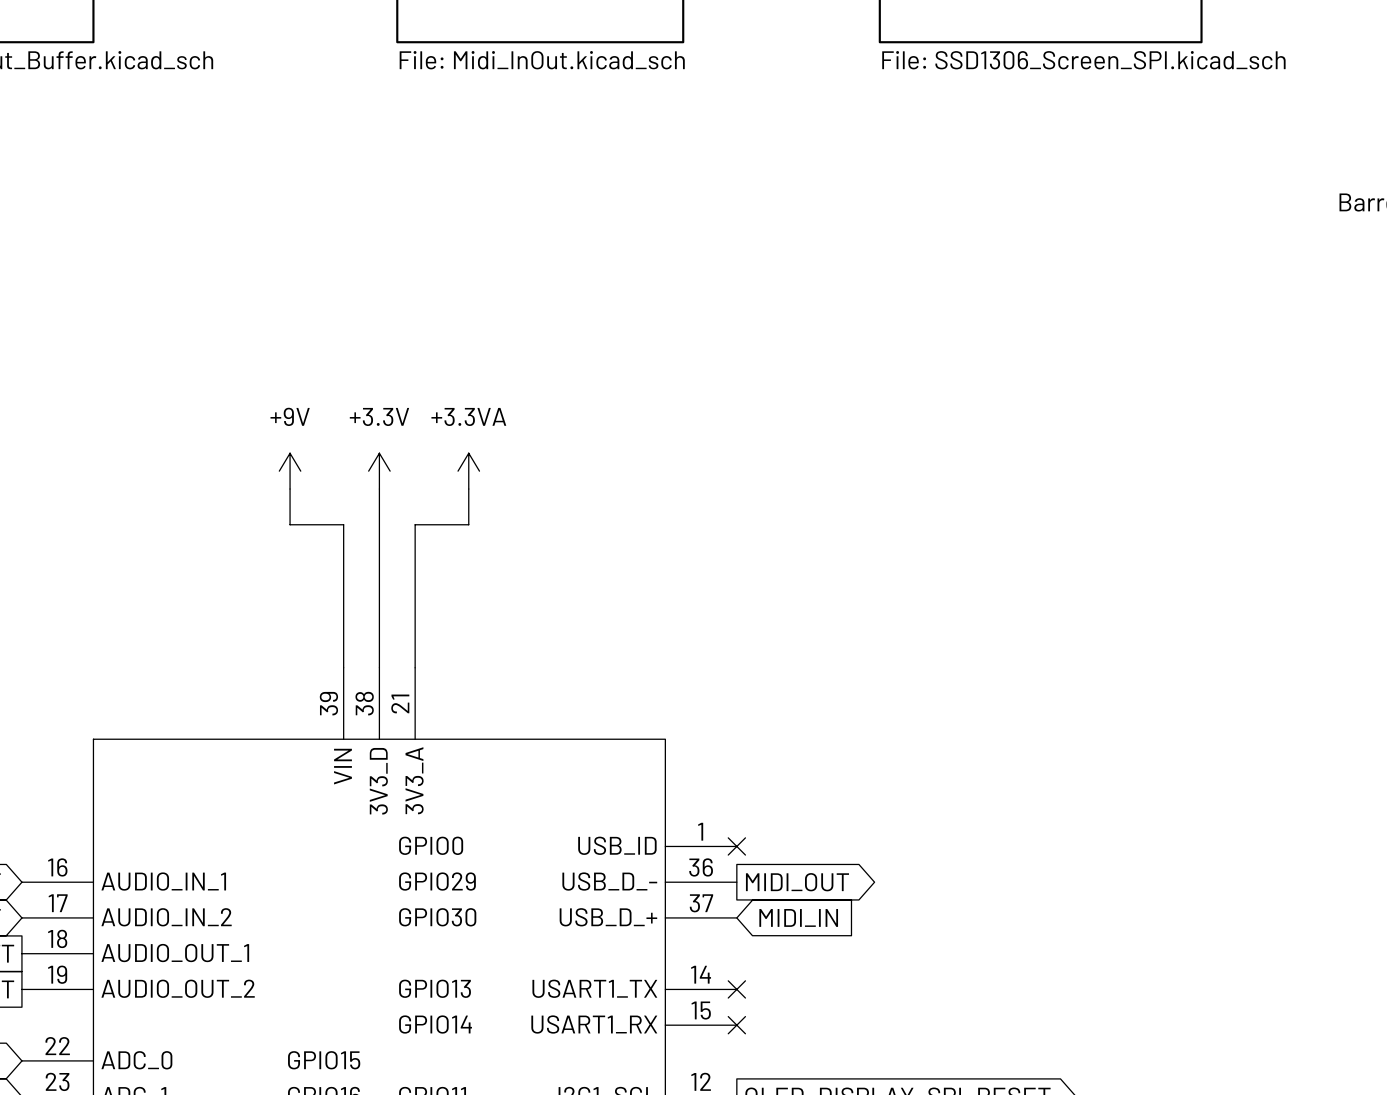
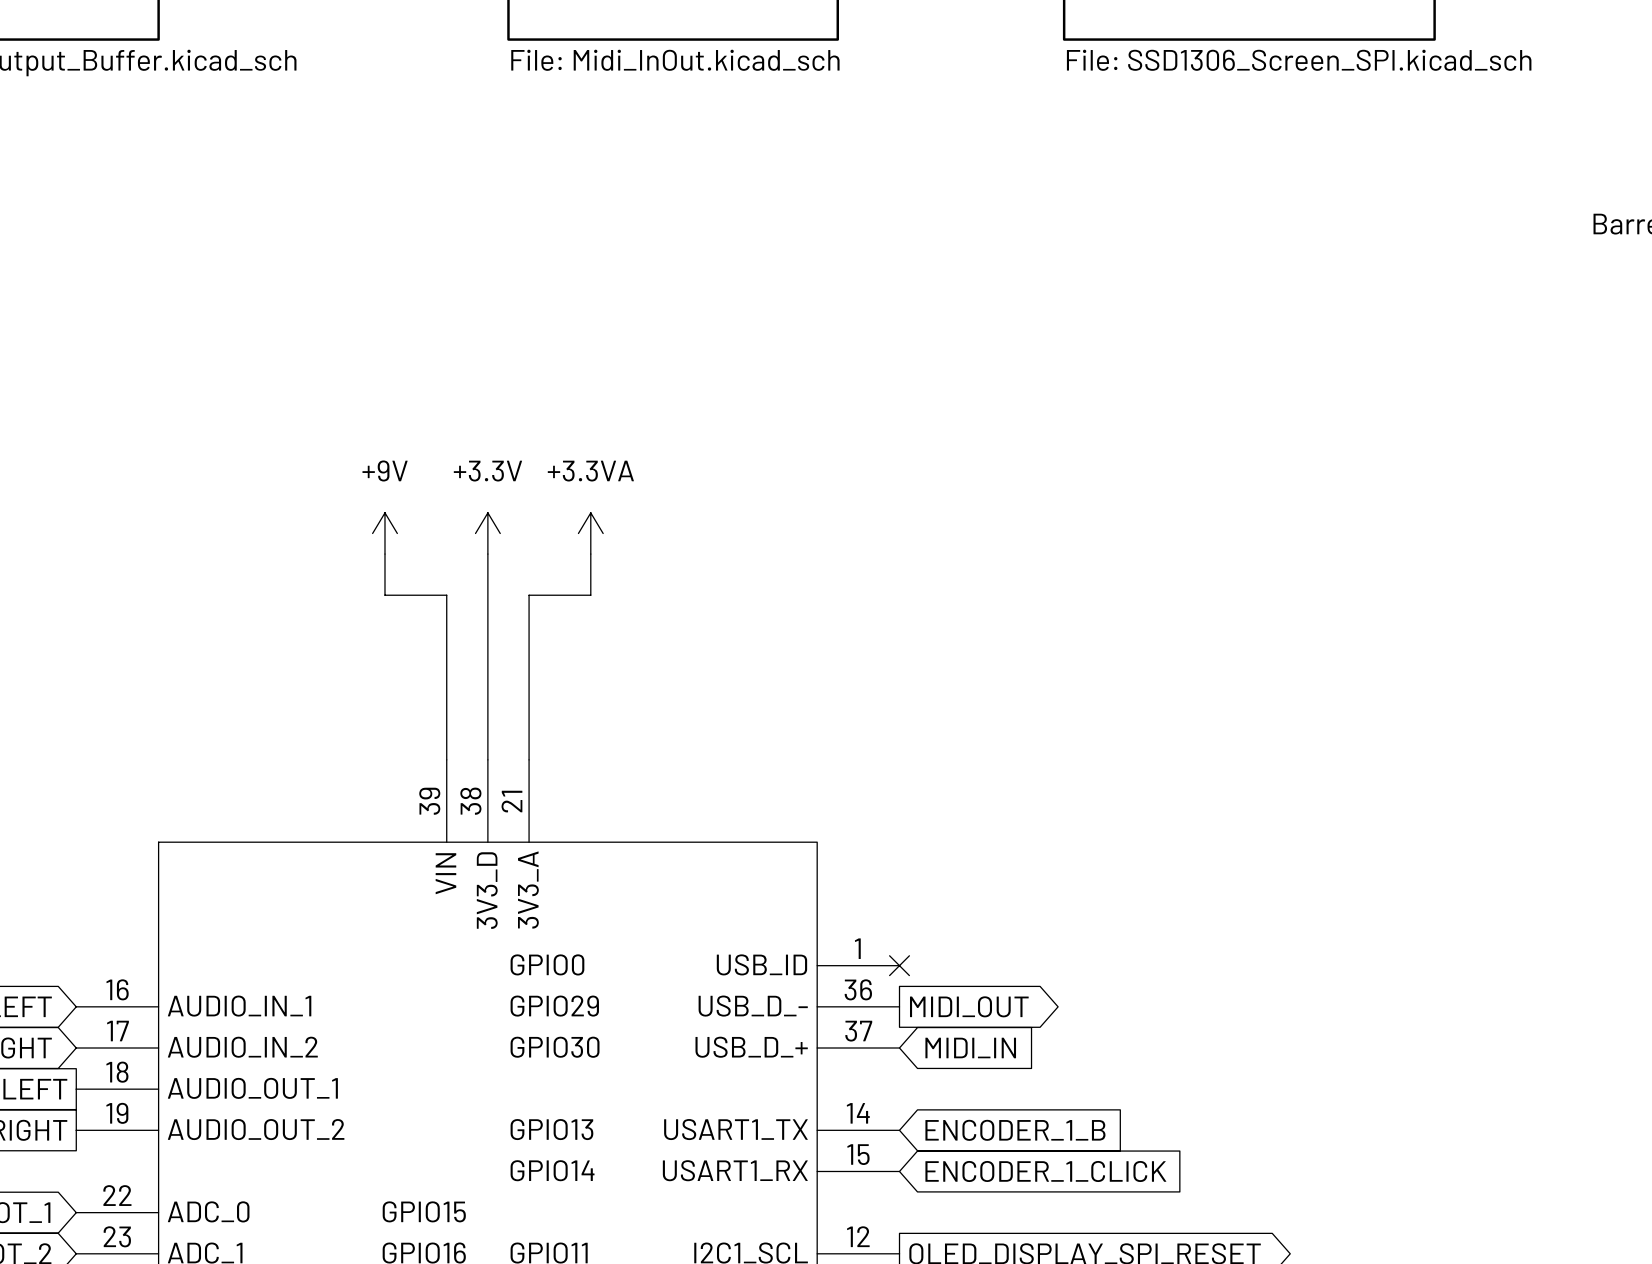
no-connect mark: (736, 989) -> none
global label: none -> ENCODER_1_B (1015, 1130)
no-connect mark: (736, 1025) -> none
global label: none -> ENCODER_1_CLICK (1045, 1171)

